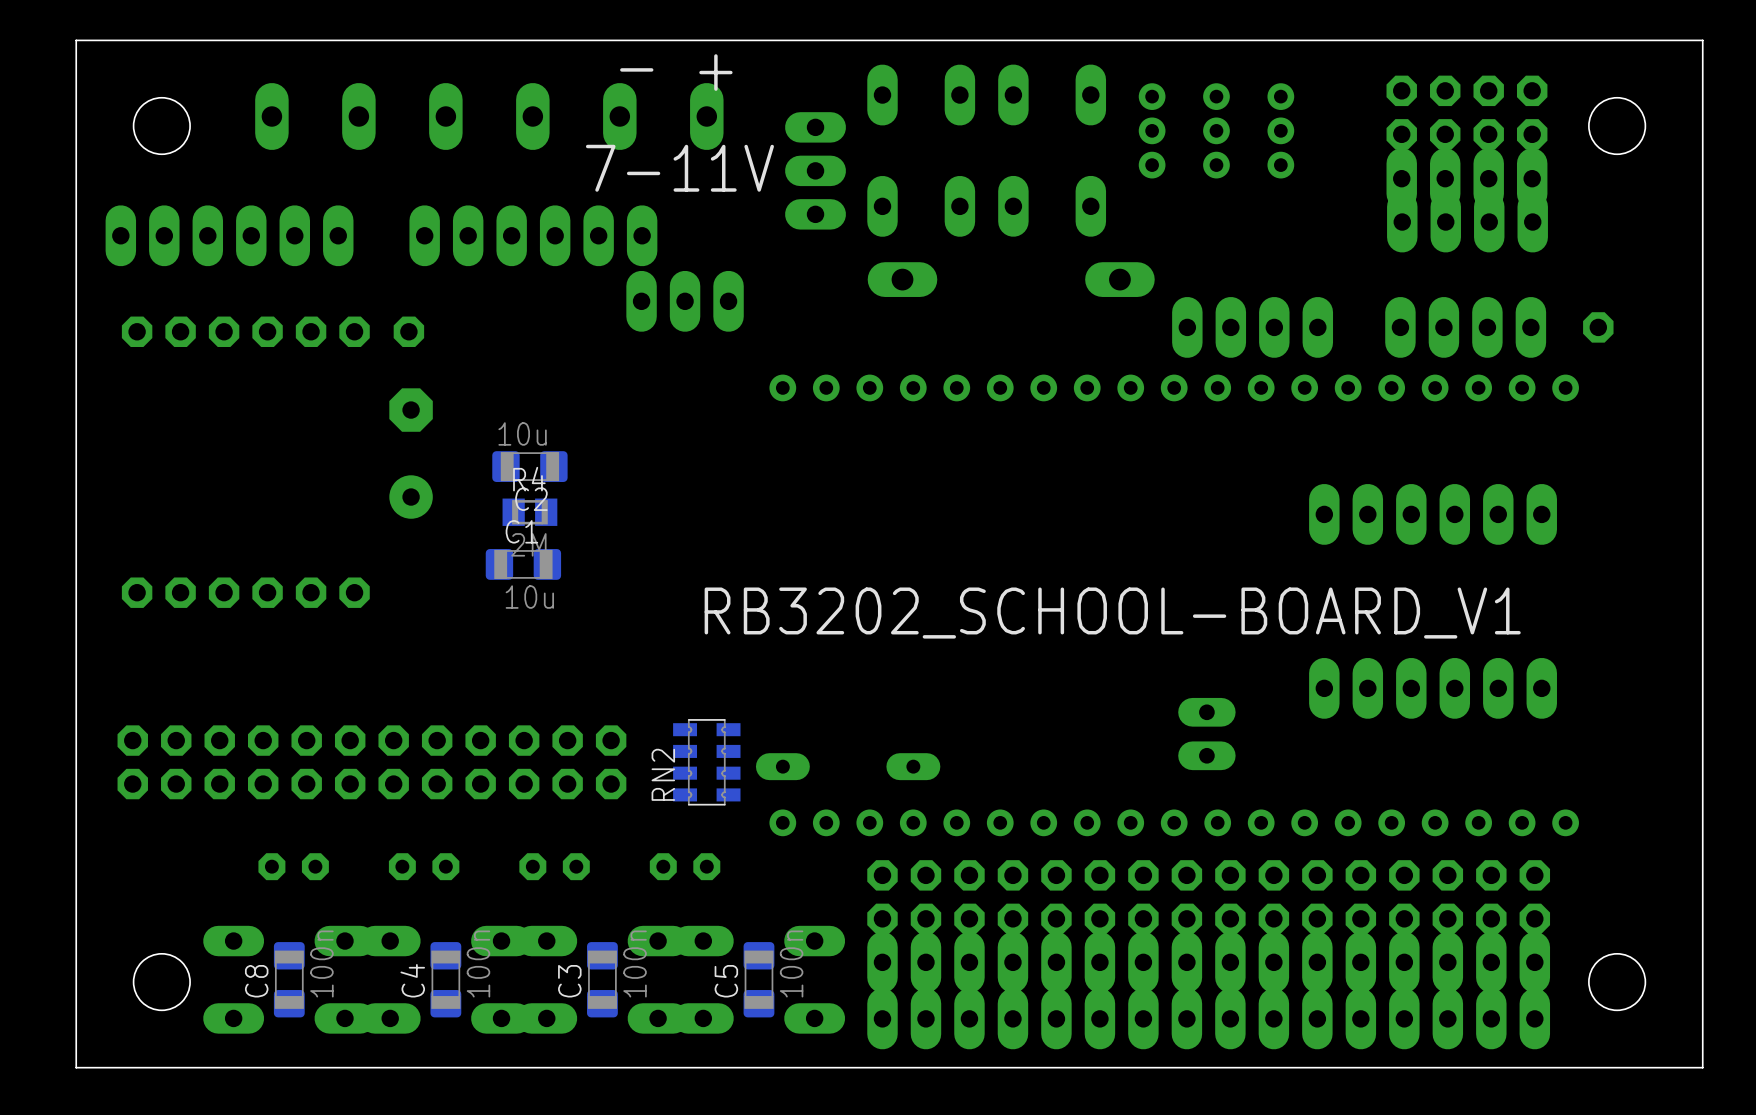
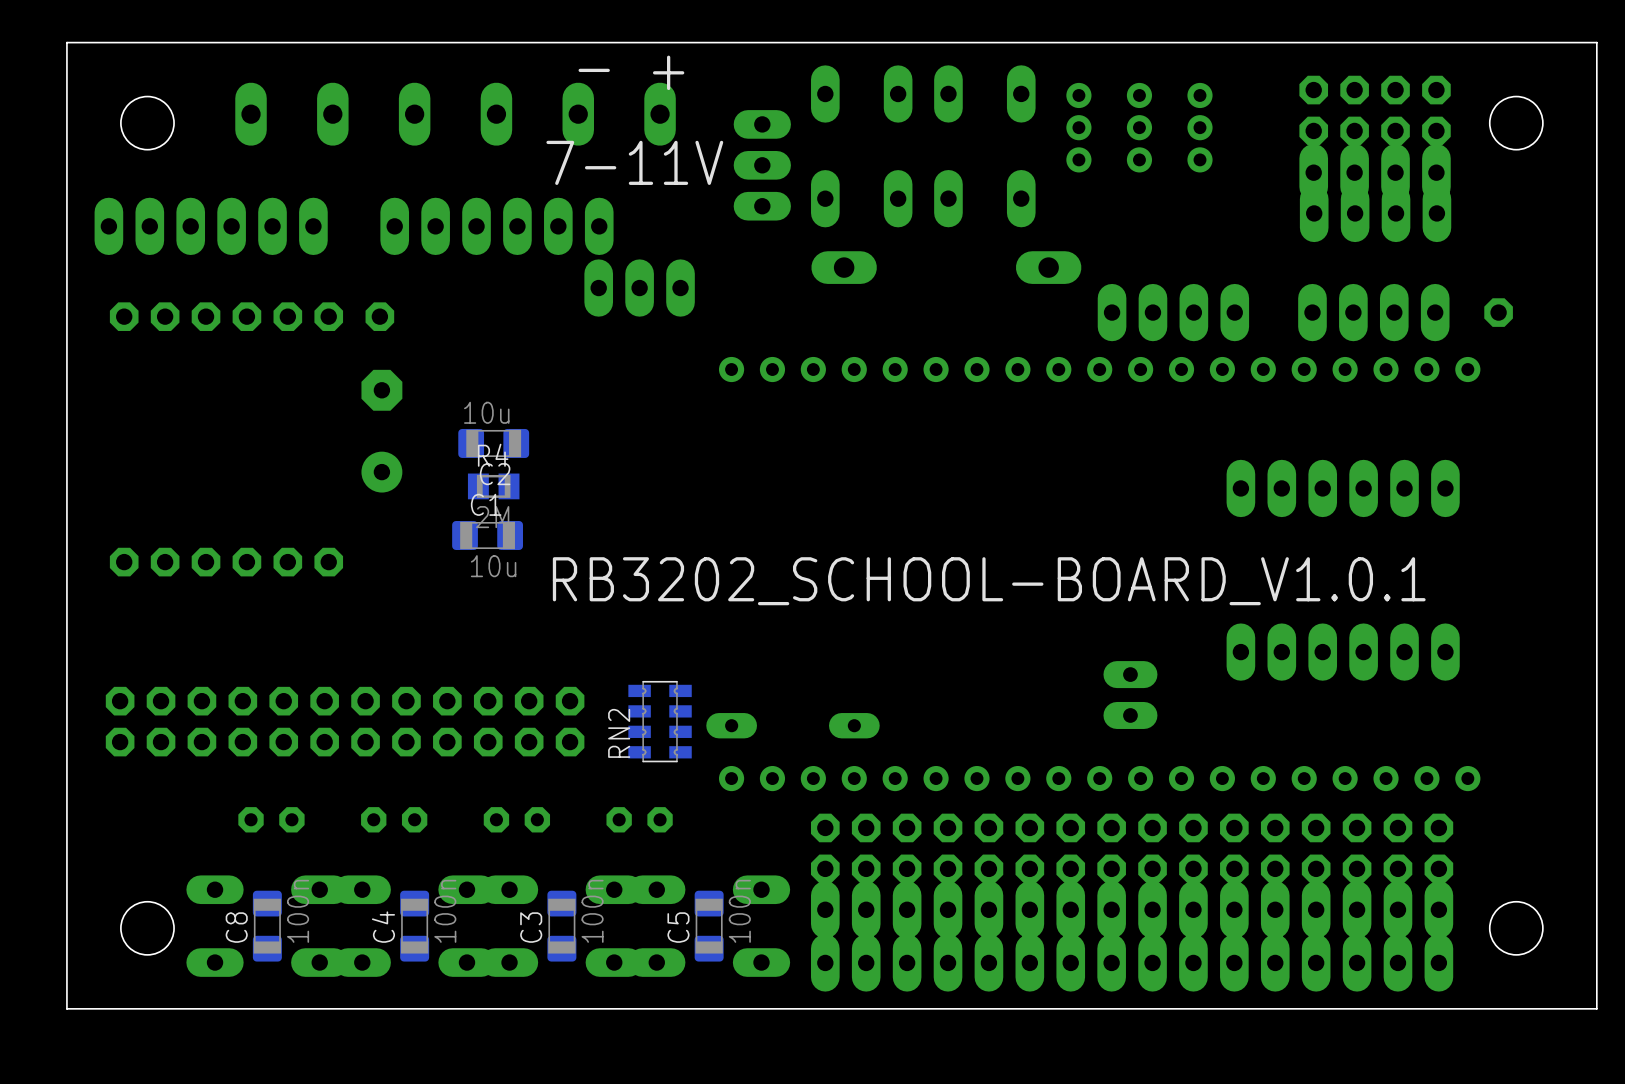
text: RB3202_SCHOOL-BOARD_V1 (1112, 613) -> RB3202_SCHOOL-BOARD_V1.0.1 (989, 581)

